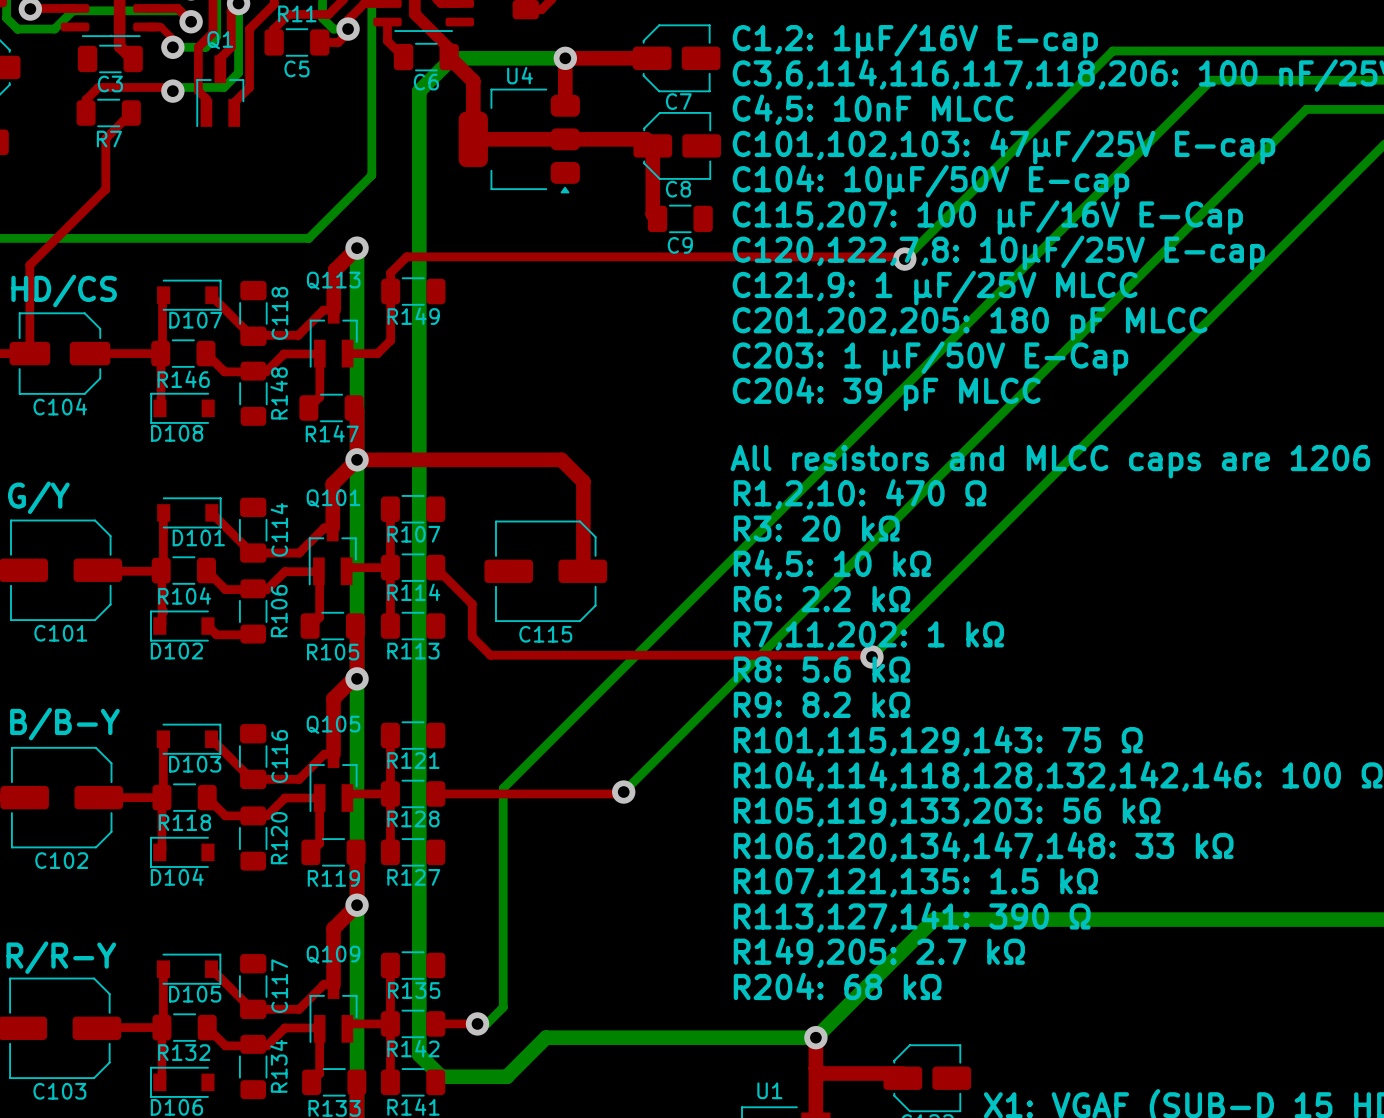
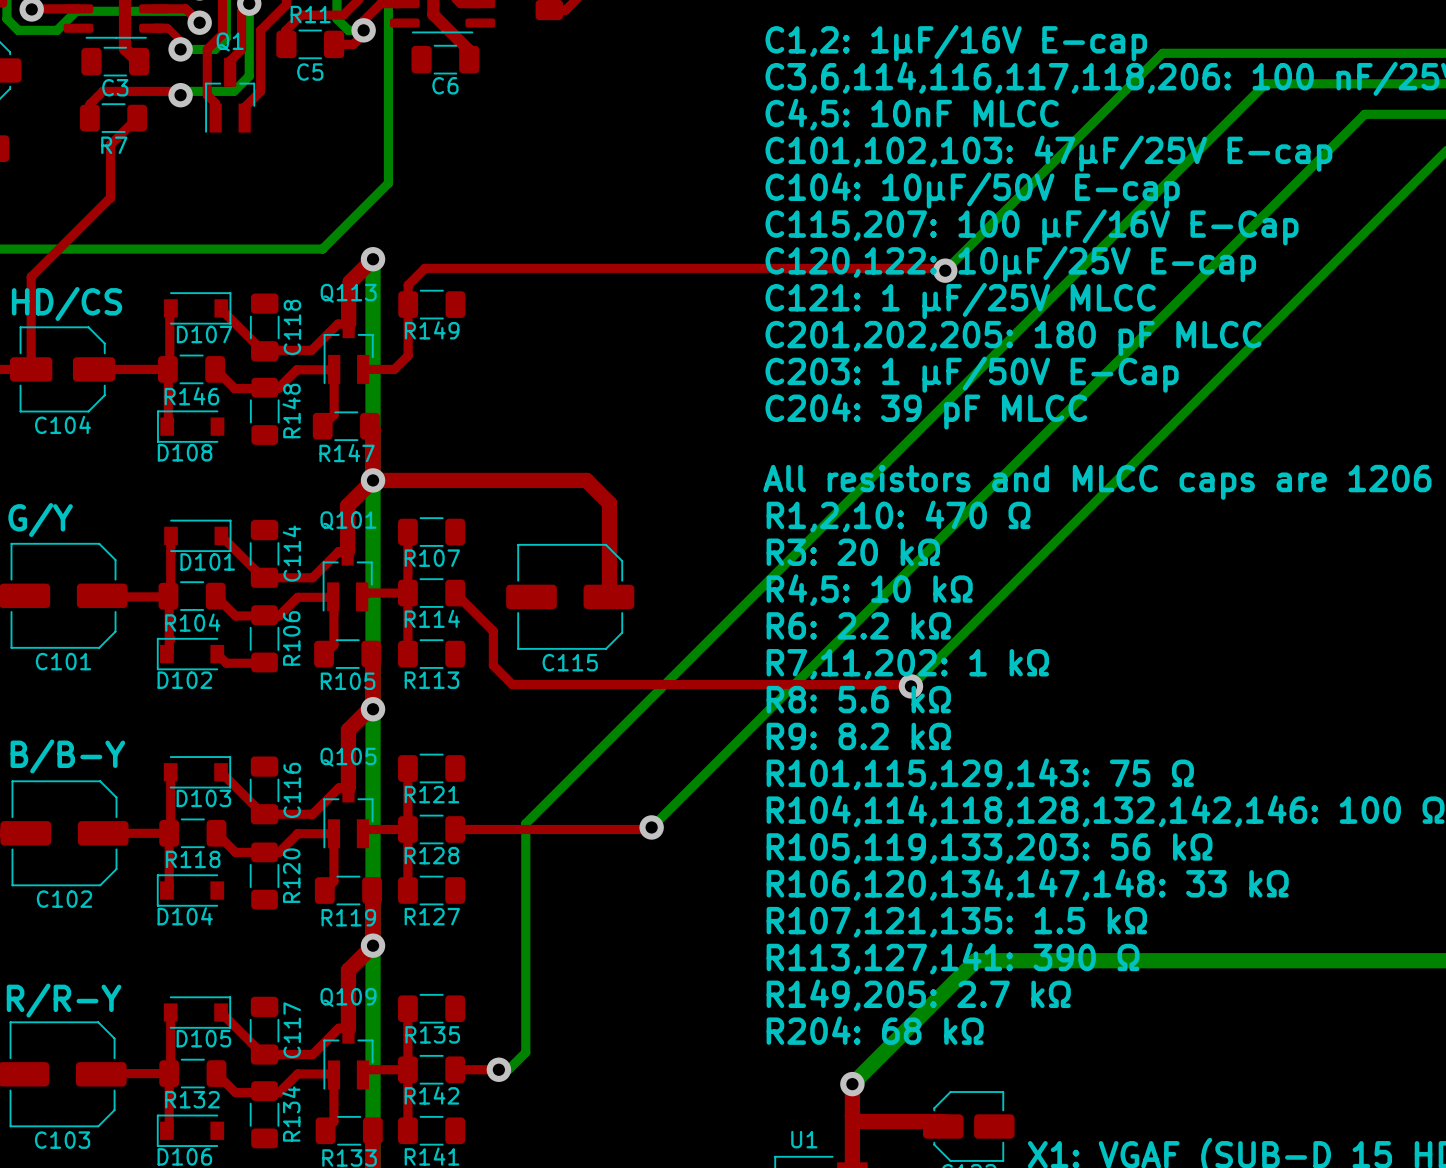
top track: (387, 22) (387, 41) (403, 57) -> none
top track: (449, 57) (473, 81) (473, 139) (646, 139) (652, 145) (652, 214) (657, 218) -> none
bottom track: (565, 58) (452, 58) (419, 91) (419, 1054) (441, 1076) (506, 1076) (545, 1037) (815, 1037) -> none
via: (565, 58) -> none
top track: (652, 58) (565, 58) (565, 105) -> none
C7: (676, 58) -> none
U4: (519, 141) -> none
C8: (677, 145) -> none
C9: (680, 218) -> none
text: C120,122,7,8: 10µF/25V E-cap (998, 252) -> C120,122: 10µF/25V E-cap (1010, 264)
text: C121,9: 1 µF/25V MLCC (935, 288) -> C121: 1 µF/25V MLCC (960, 301)

